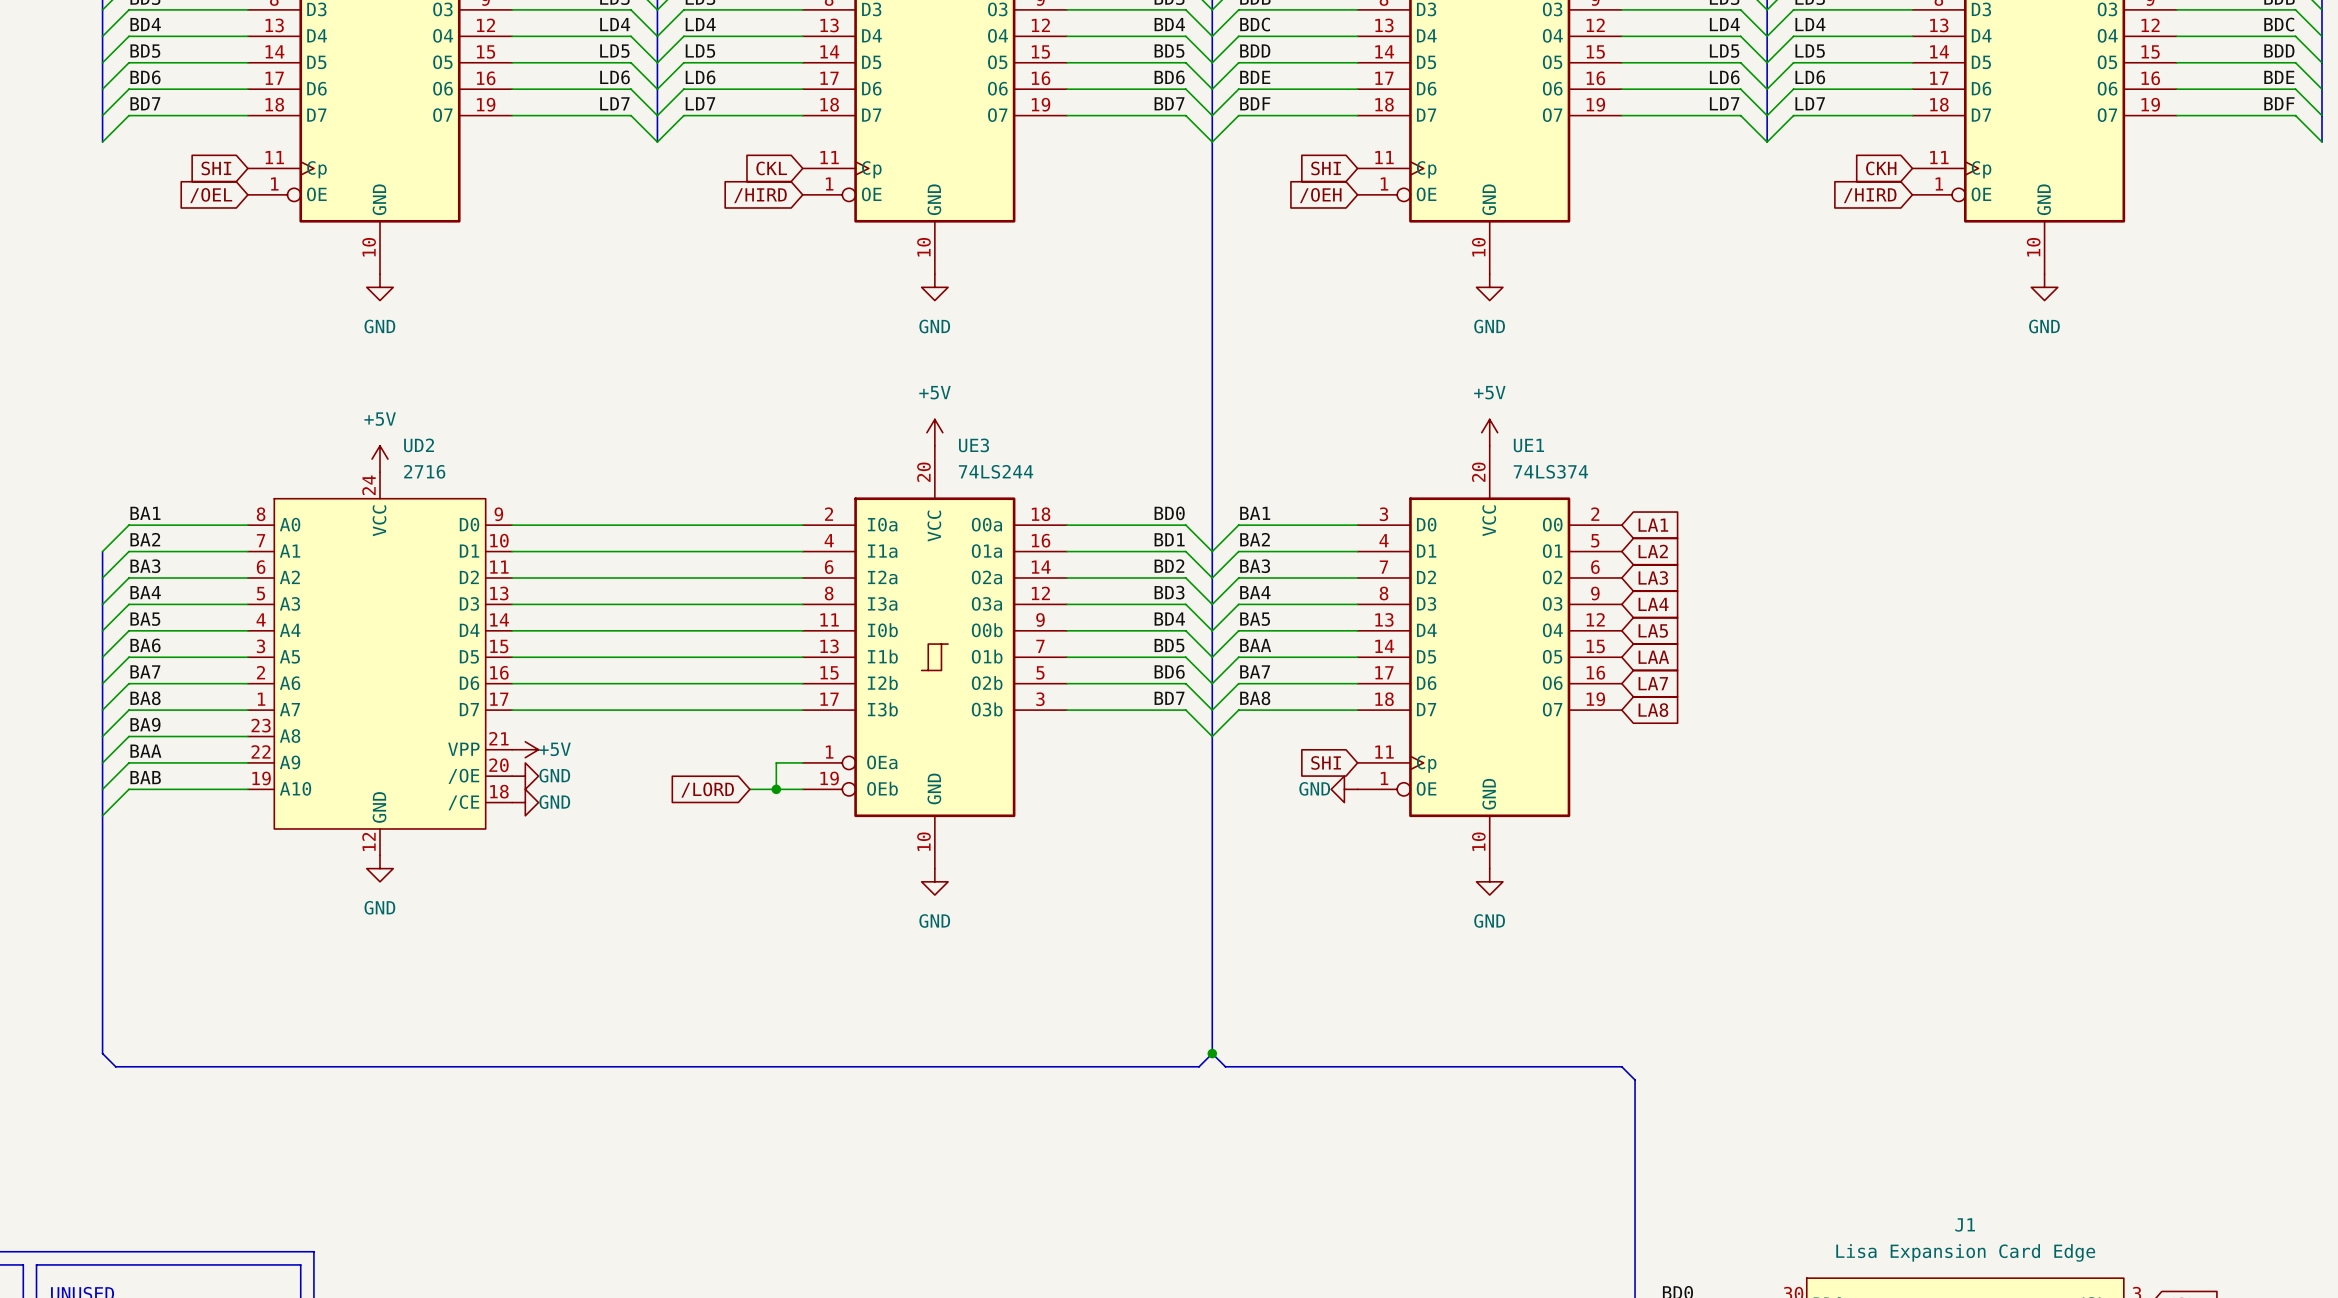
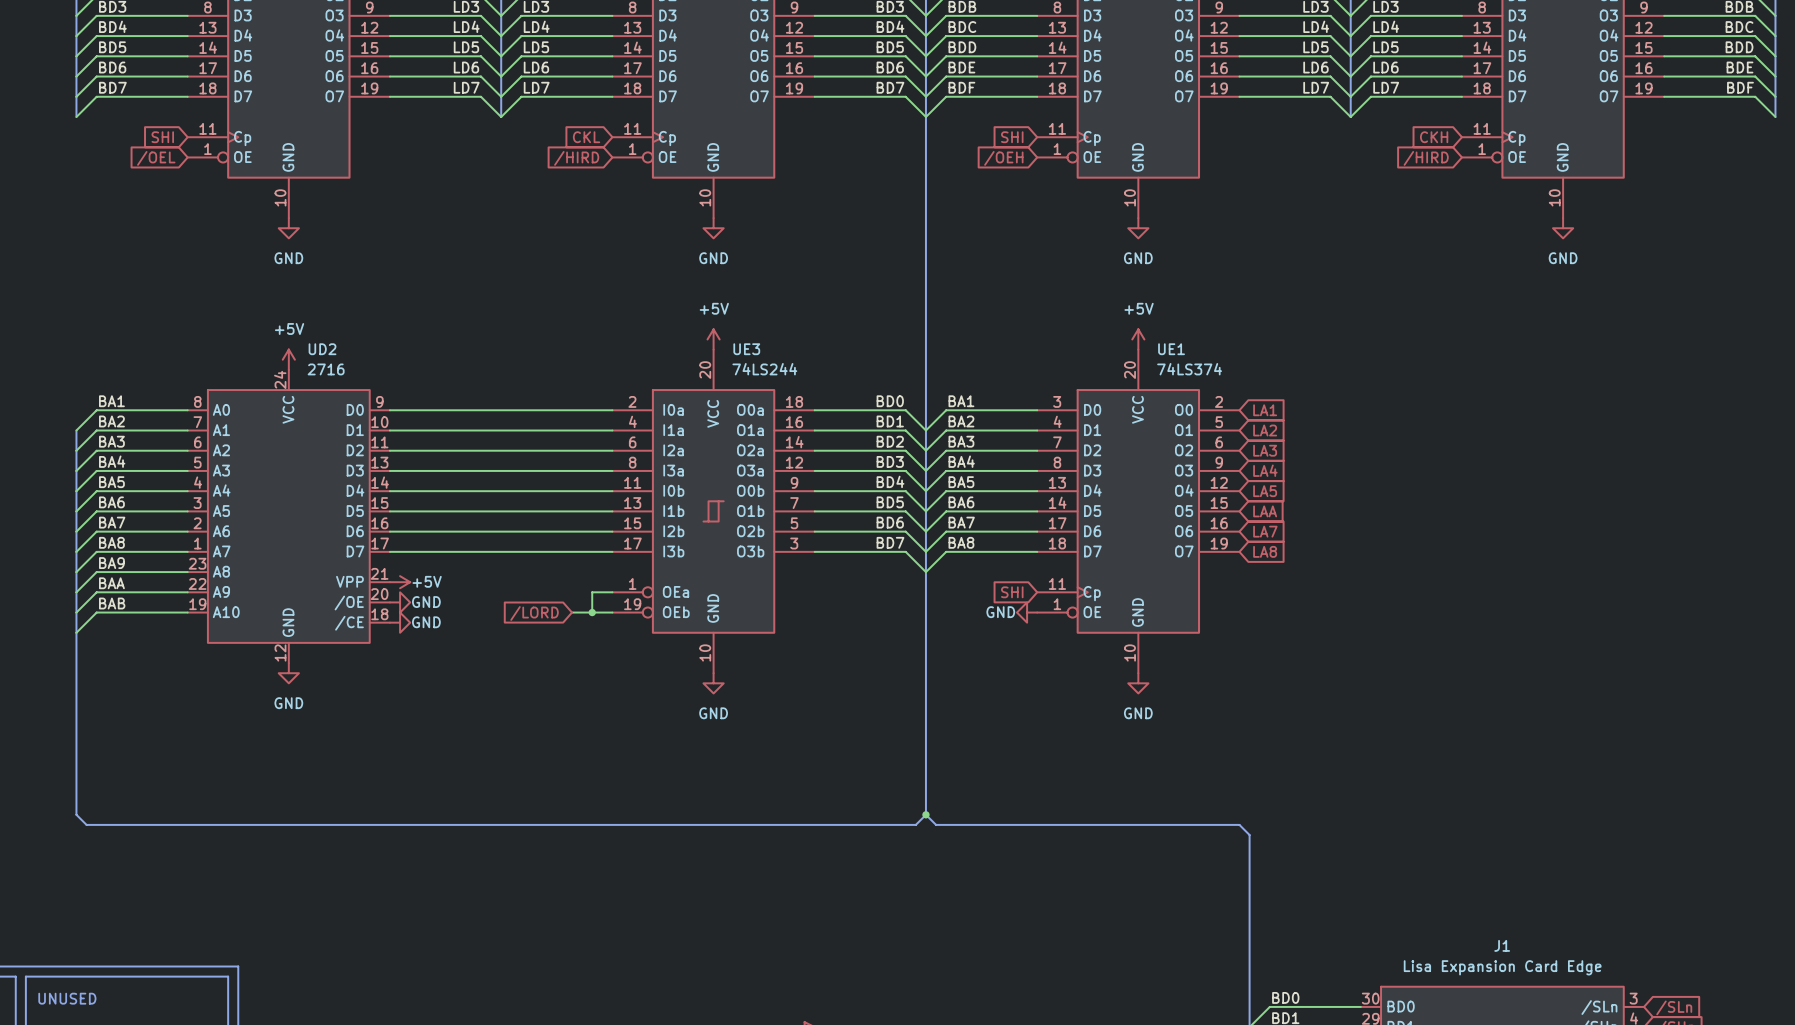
label: BAA (1255, 645) -> BA6 (961, 502)

